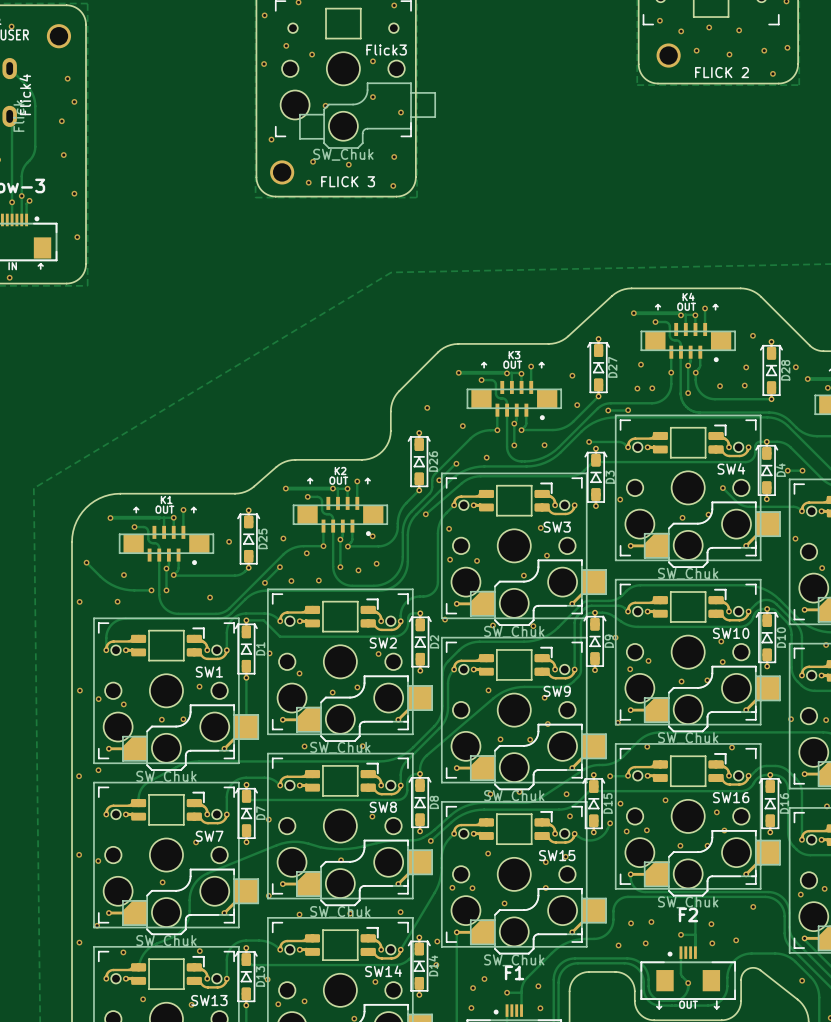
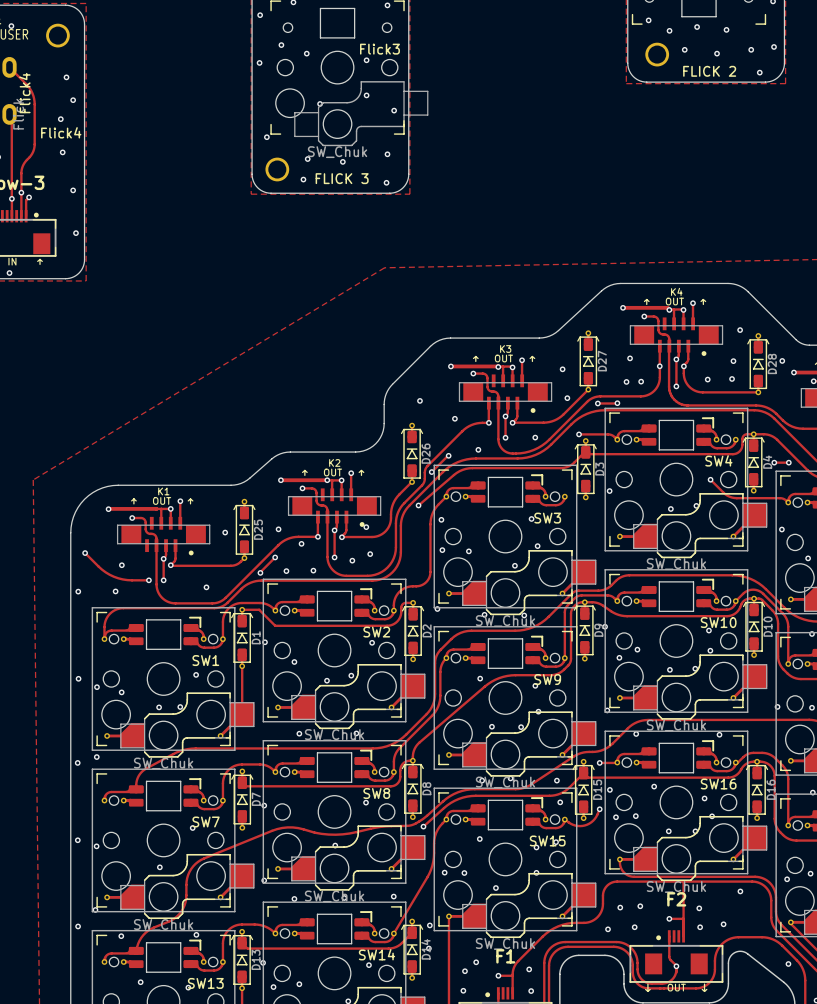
text: none -> Flick4 (61, 132)

